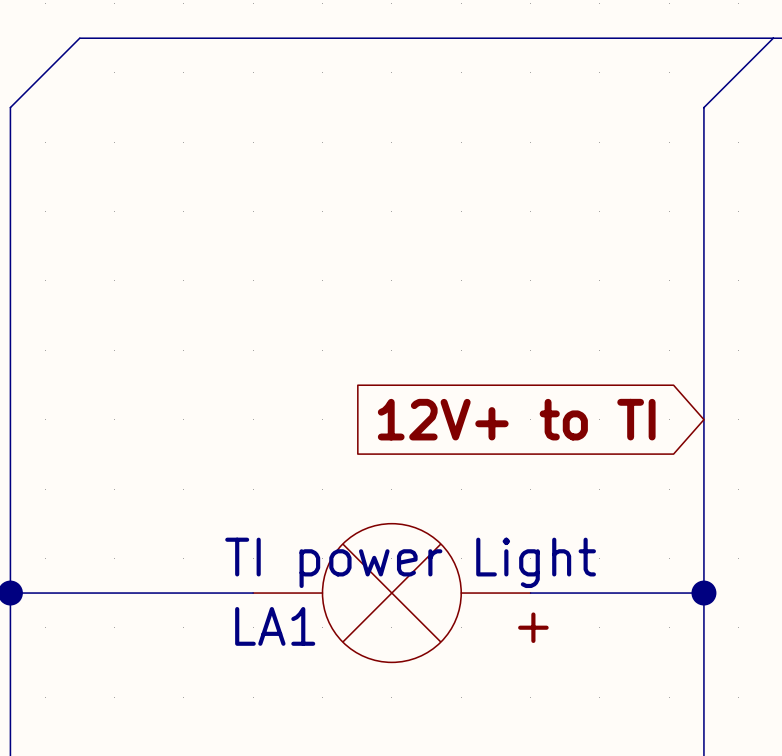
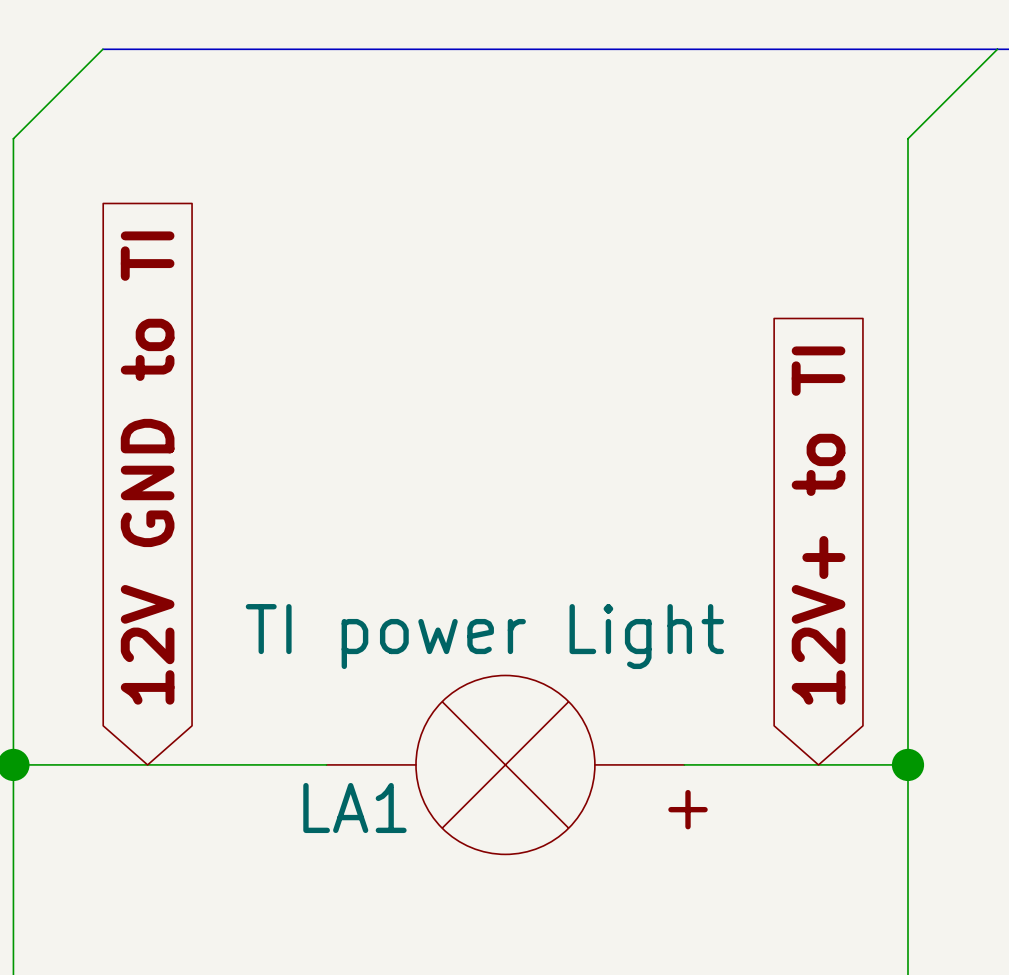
global label: none -> 12V GND to TI (147, 468)
global label rotation: 0° (516, 419) -> 90° clockwise (818, 525)
LA1 value position: TI power Light (410, 562) -> TI power Light (484, 636)

